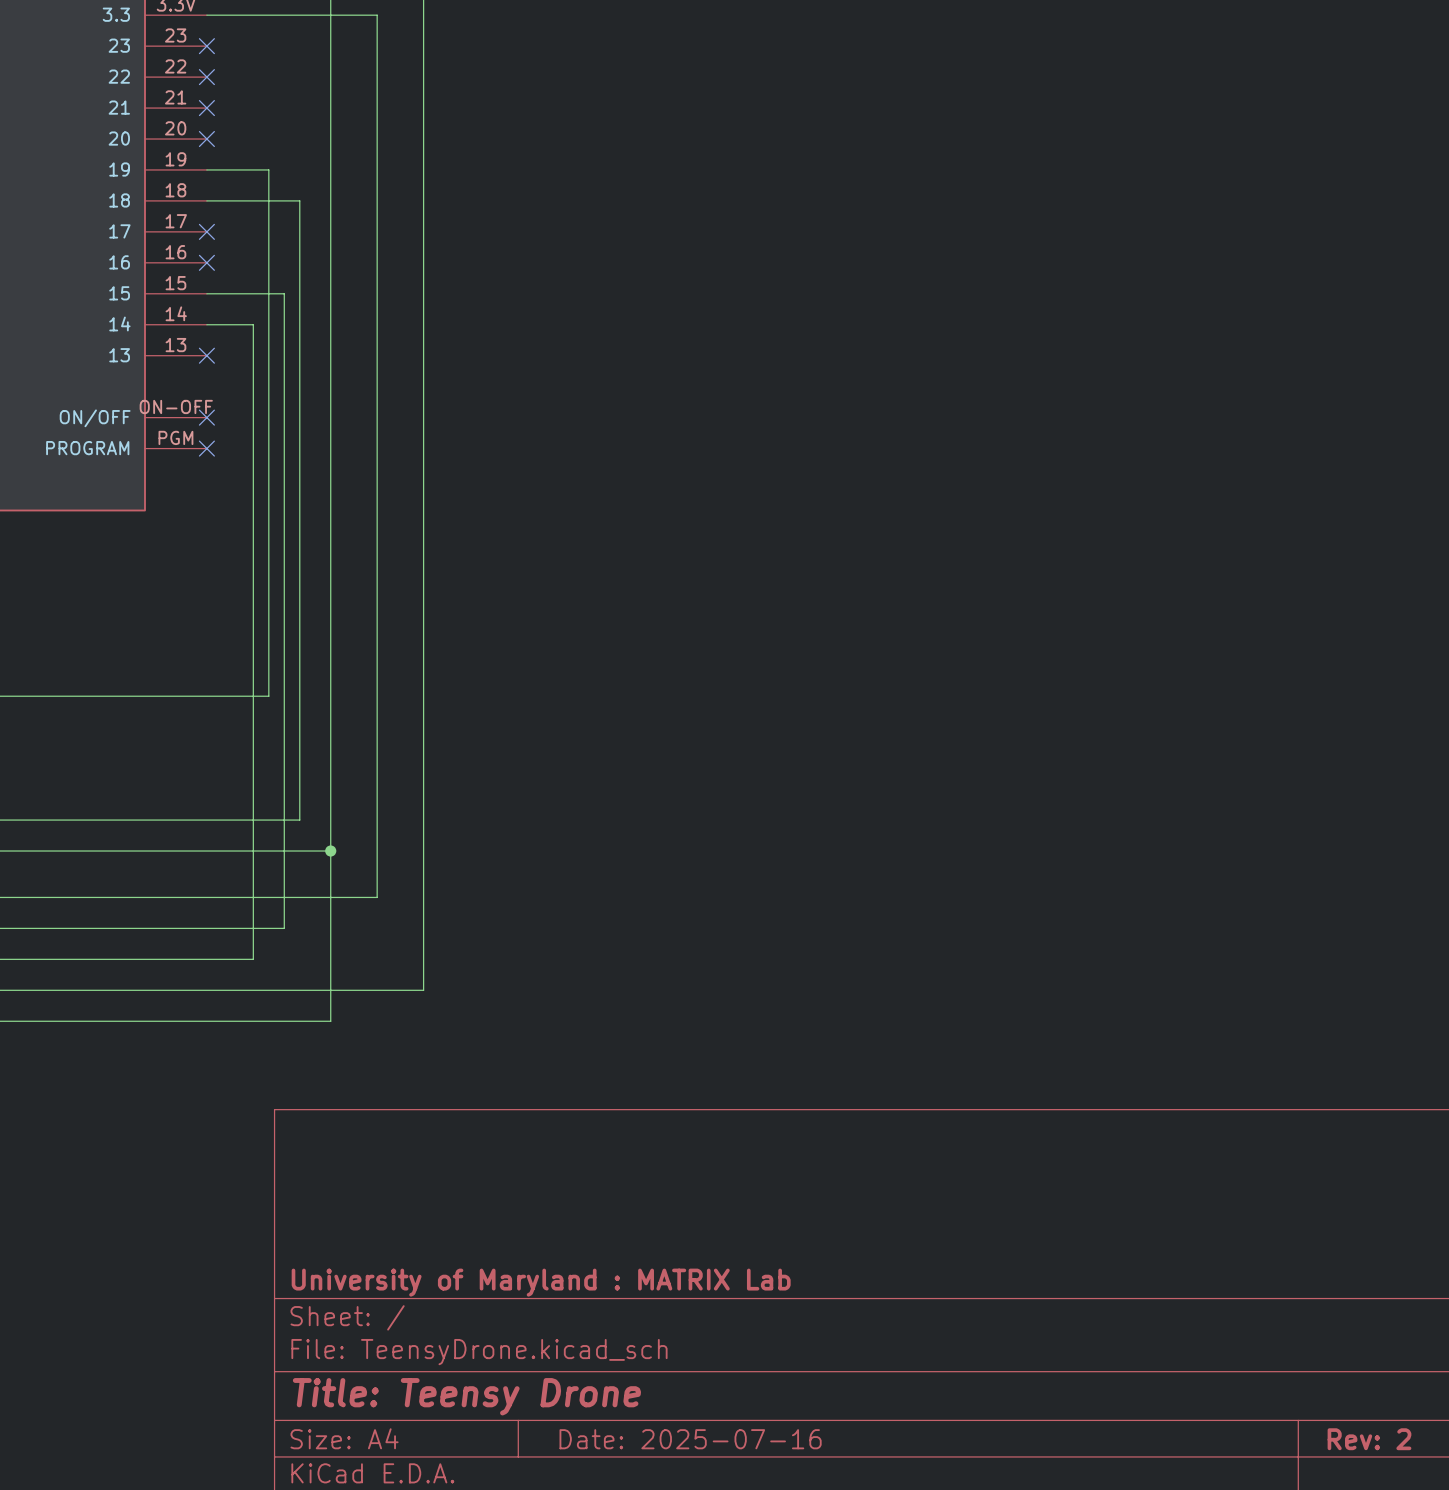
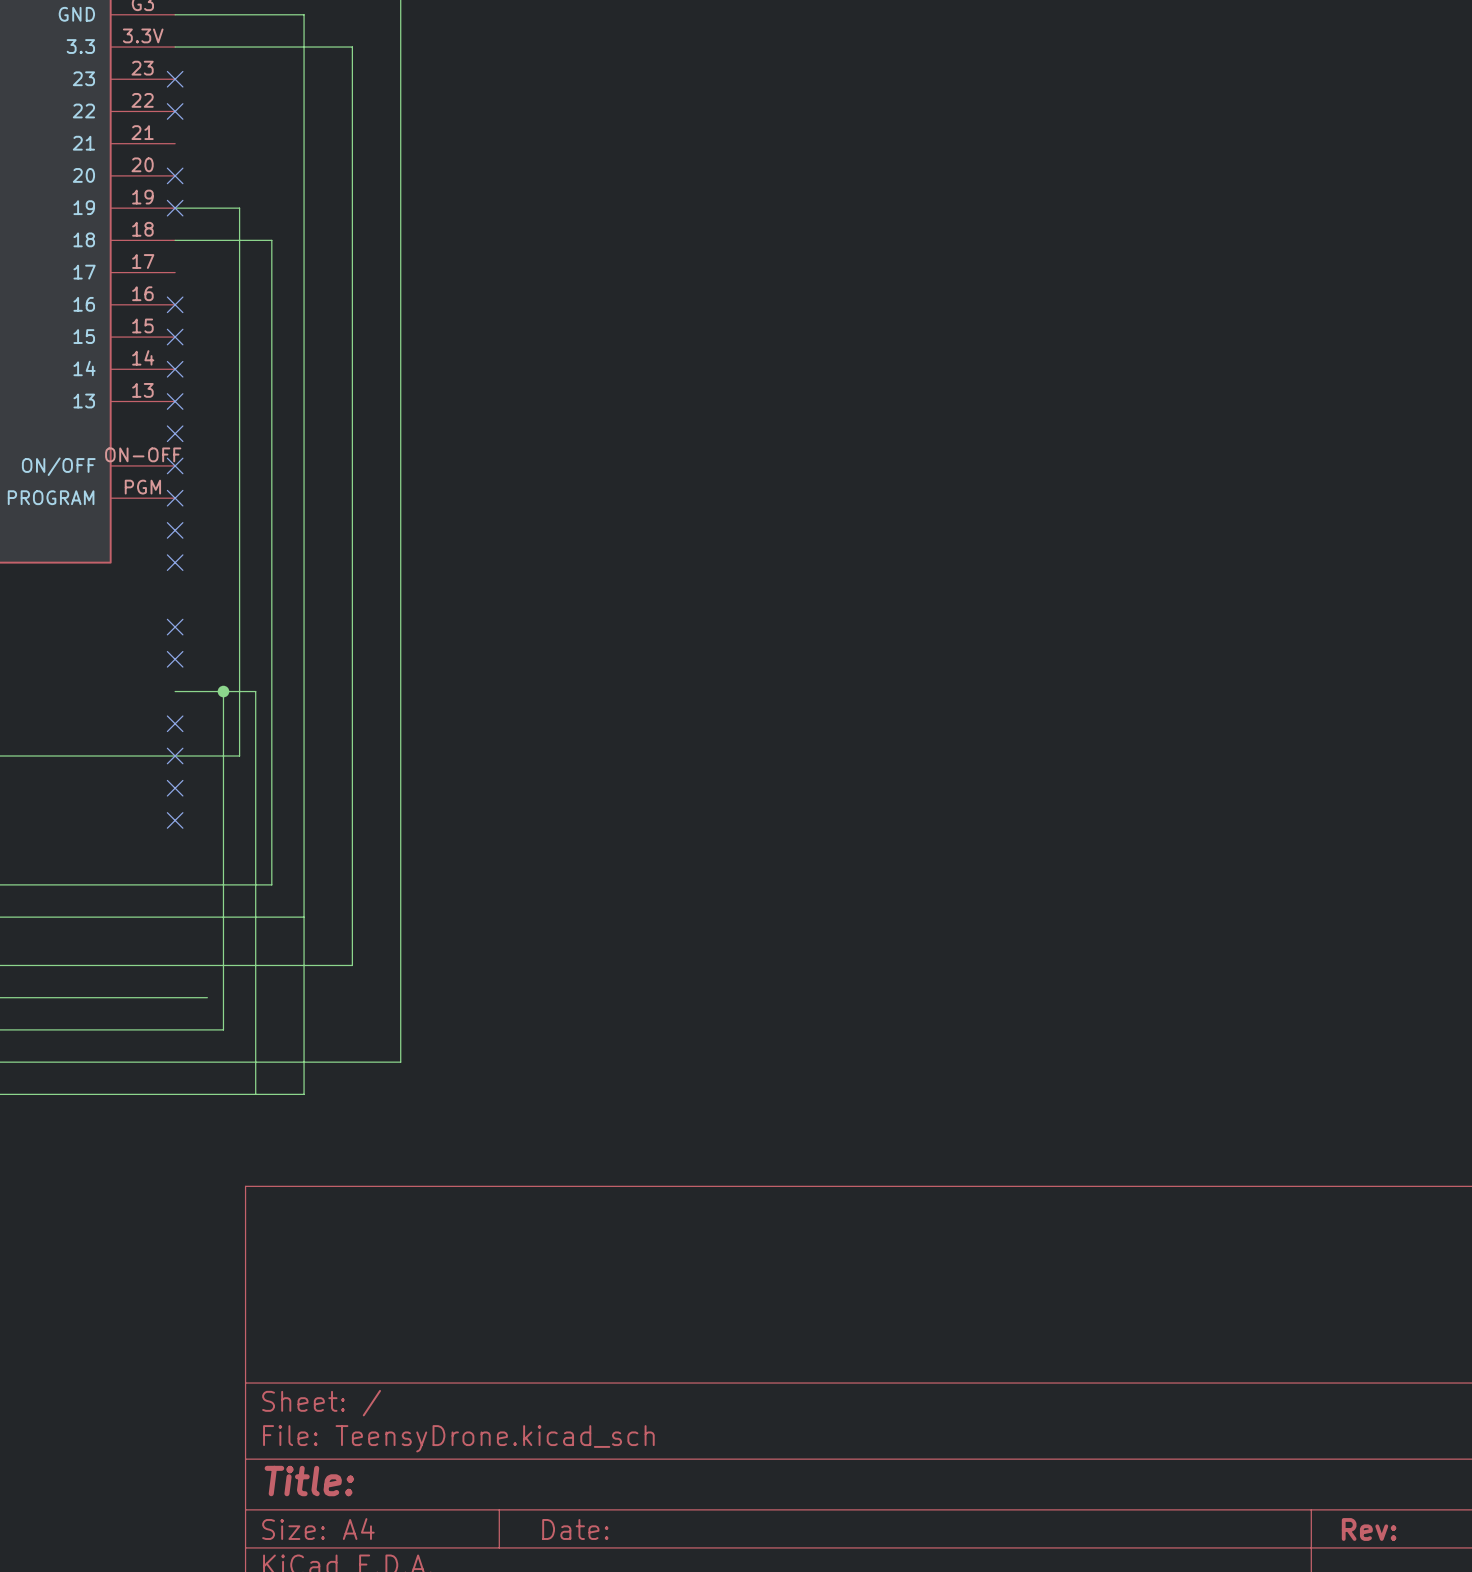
no-connect mark: (206, 108) -> none
no-connect mark: none -> (175, 208)
no-connect mark: (206, 231) -> none
wire: (206, 293) (284, 293) (284, 634) -> (175, 691) (255, 691)
no-connect mark: none -> (175, 337)
wire: (206, 324) (253, 324) (253, 634) -> none
no-connect mark: none -> (175, 369)
no-connect mark: none -> (175, 433)
no-connect mark: none -> (175, 530)
no-connect mark: none -> (175, 562)
no-connect mark: none -> (175, 627)
no-connect mark: none -> (175, 659)
junction: none -> (223, 691)
no-connect mark: none -> (175, 723)
no-connect mark: none -> (175, 755)
no-connect mark: none -> (175, 788)
no-connect mark: none -> (175, 820)
junction: (330, 851) -> none
wire: (237, 928) (284, 928) -> (255, 1094) (255, 997)
title block: University of Maryland : MATRIX Lab (541, 1282) -> none
title block: Title: Teensy Drone (466, 1396) -> Title: (309, 1481)
title block: Date: 2025-07-16 (690, 1439) -> Date: (575, 1529)
title block: Rev: 2 (1369, 1439) -> Rev: (1369, 1529)

